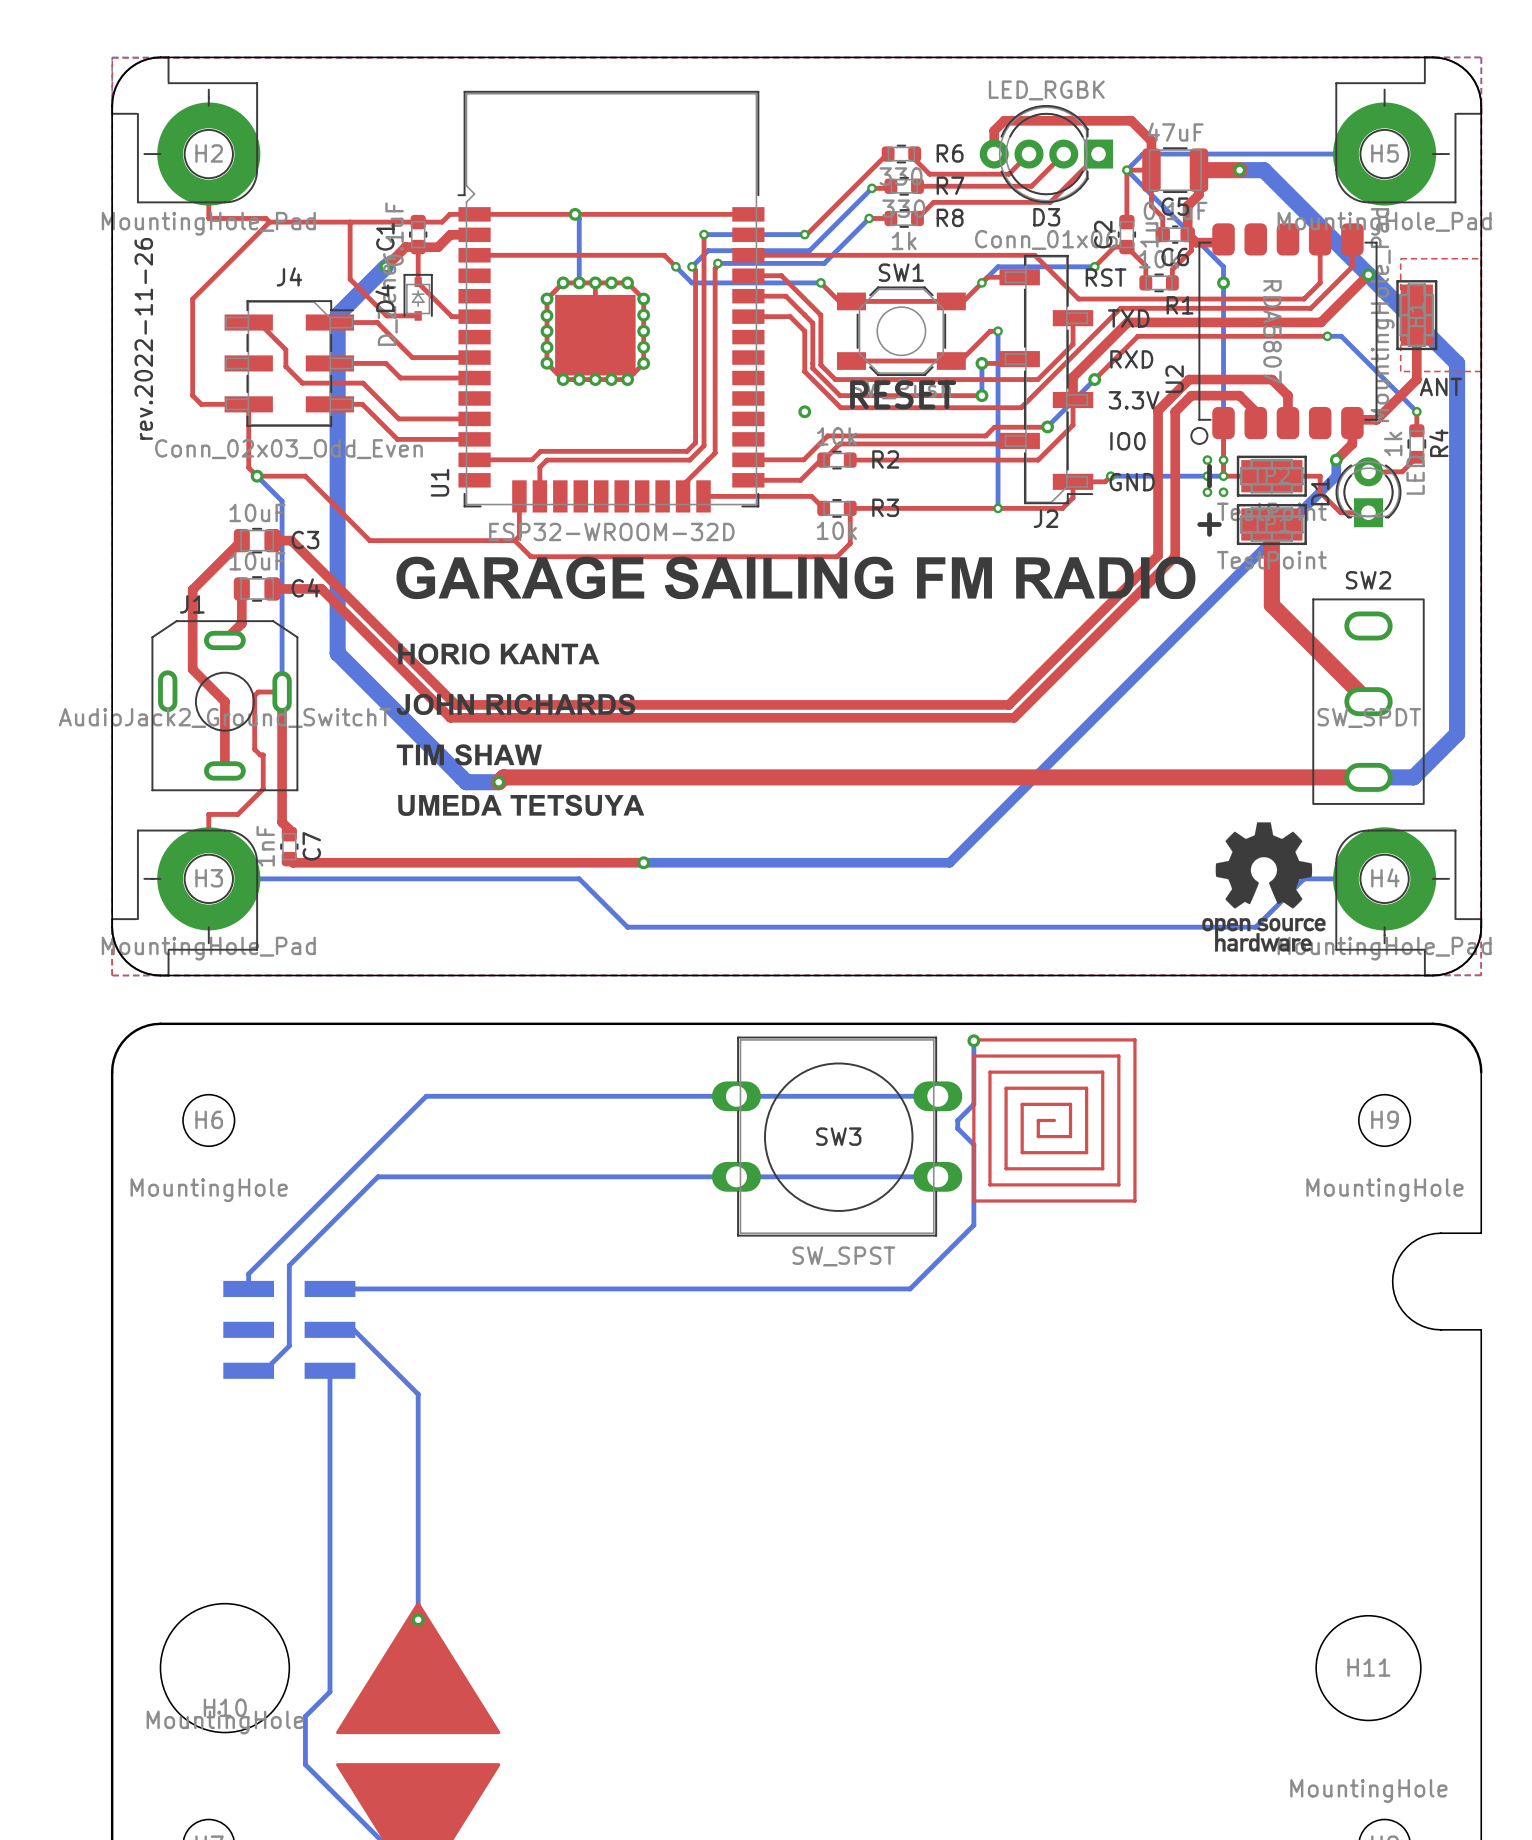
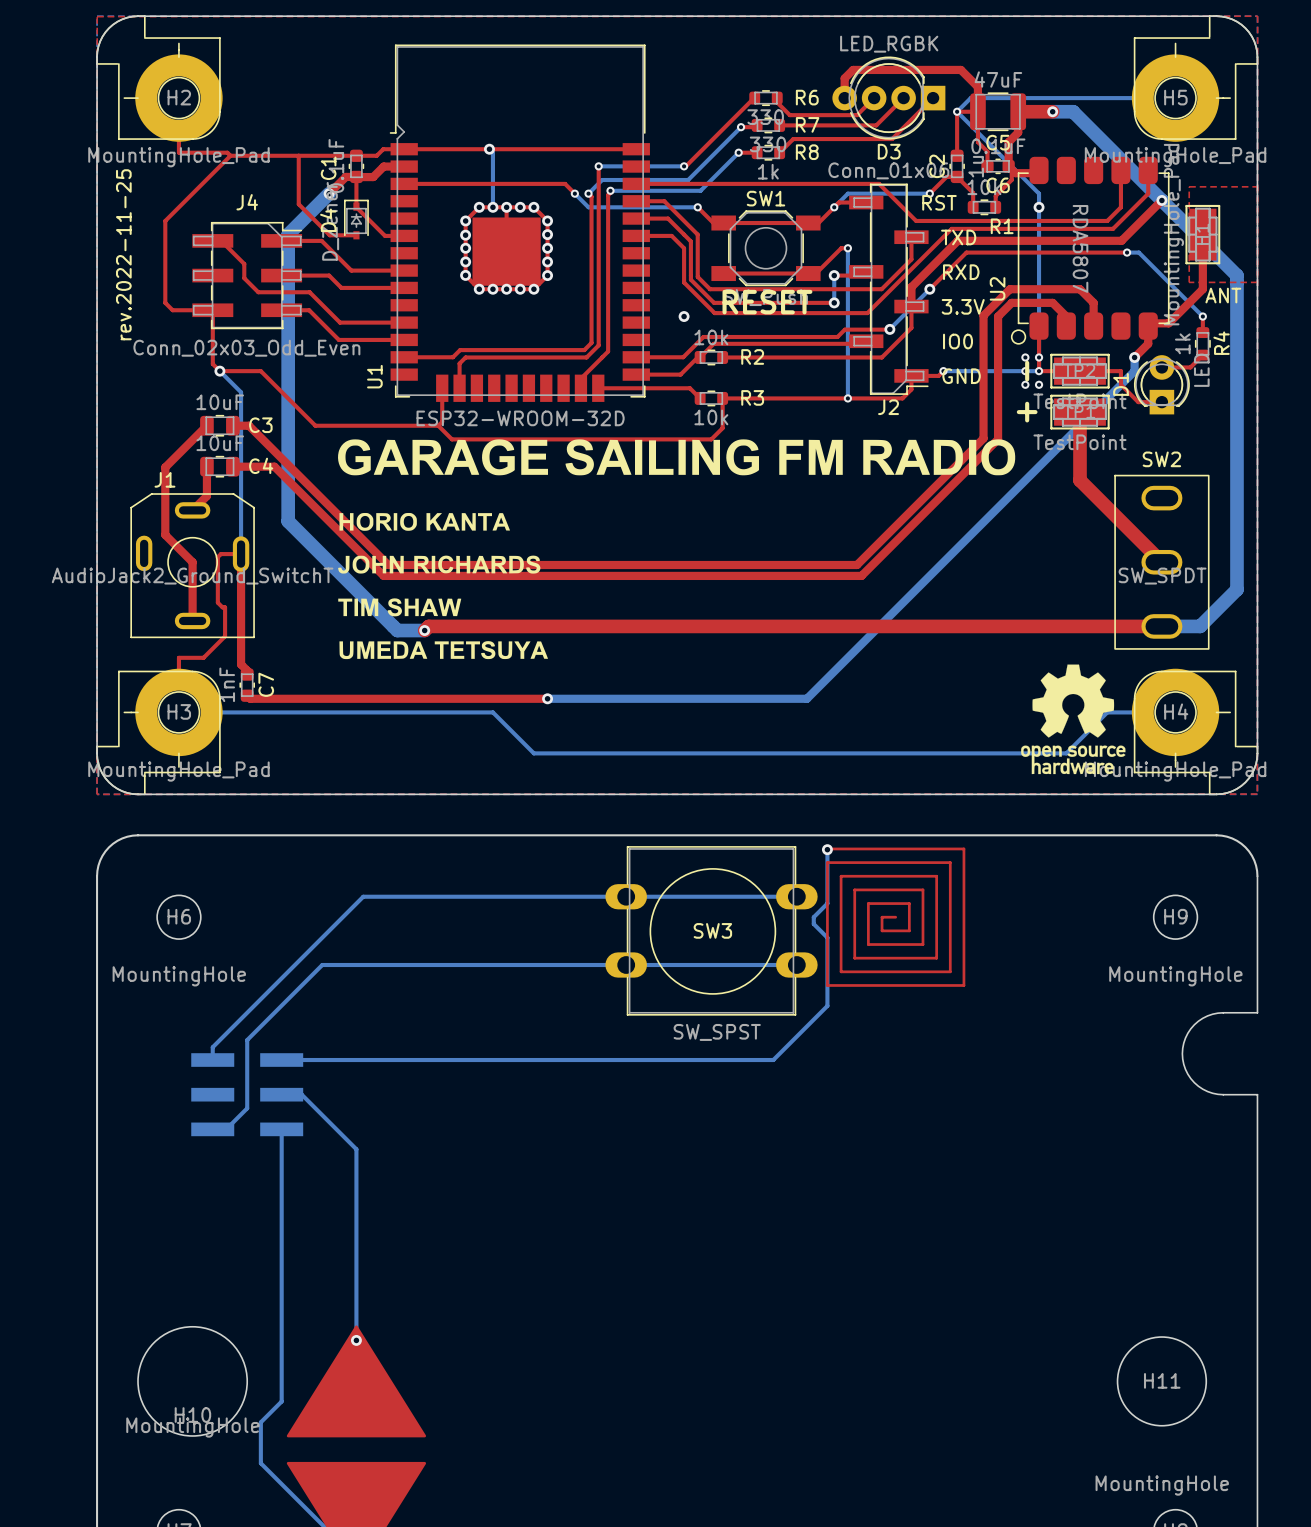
text: rev.2022-11-26 (143, 338) -> rev.2022-11-25 (123, 254)

